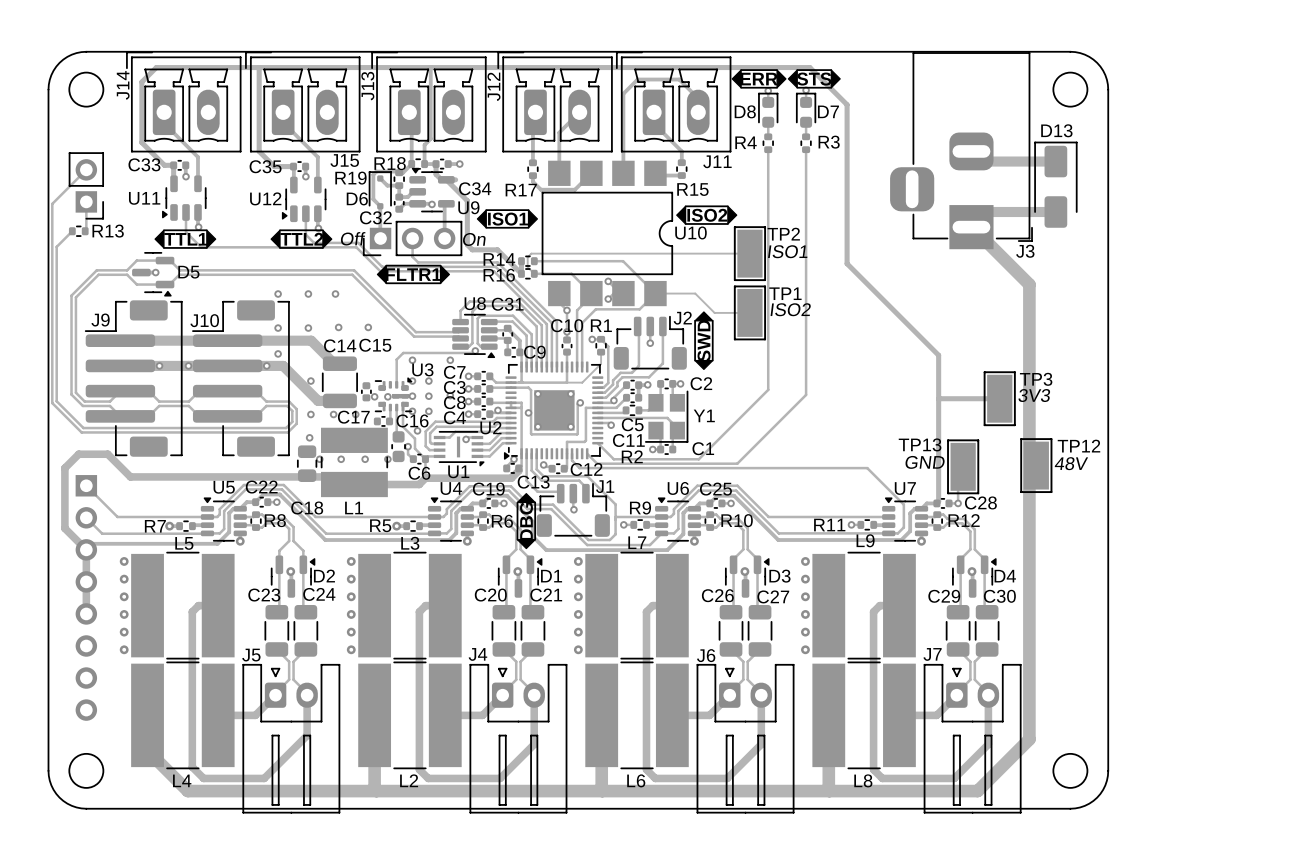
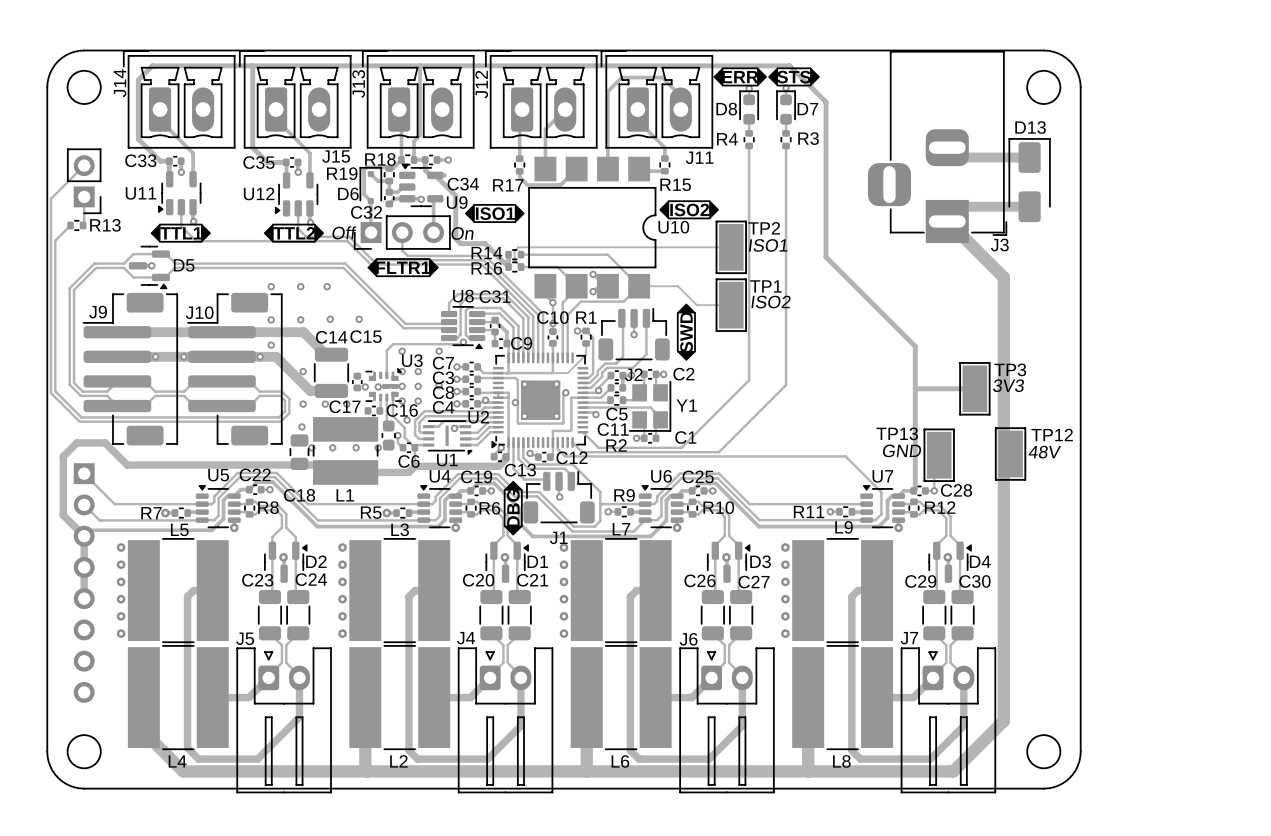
J2 name position: J2 (682, 318) -> J2 (633, 374)
J1 name position: J1 (605, 486) -> J1 (558, 537)

